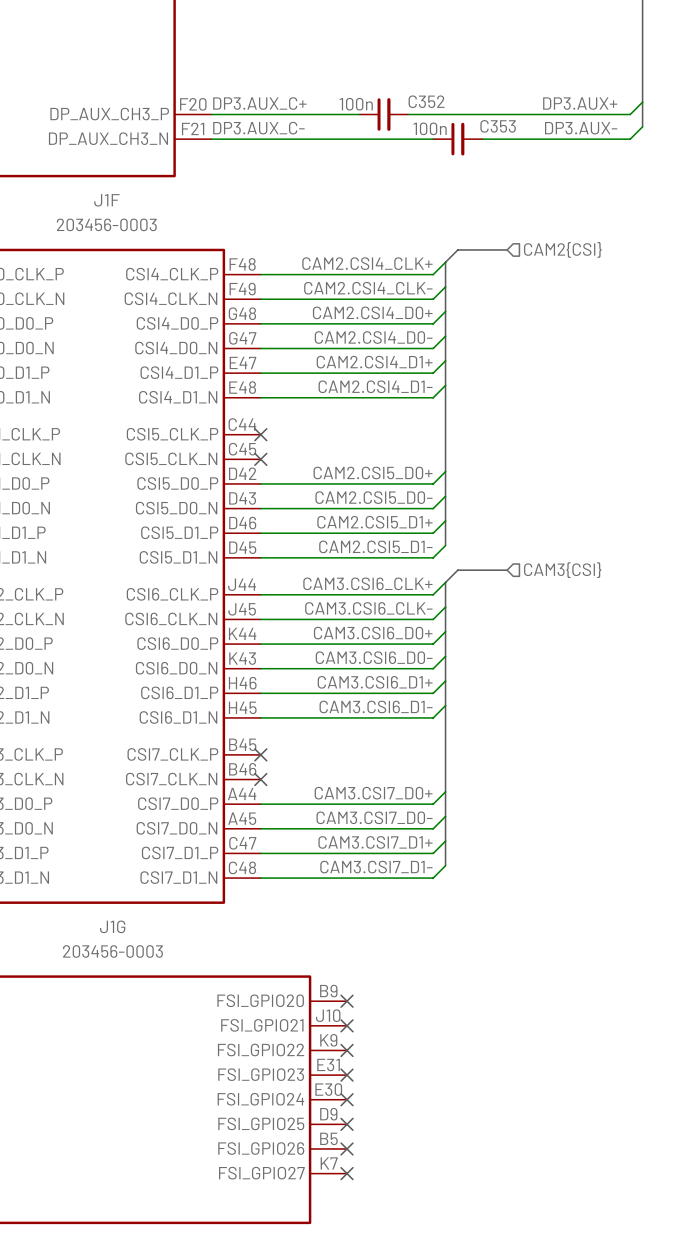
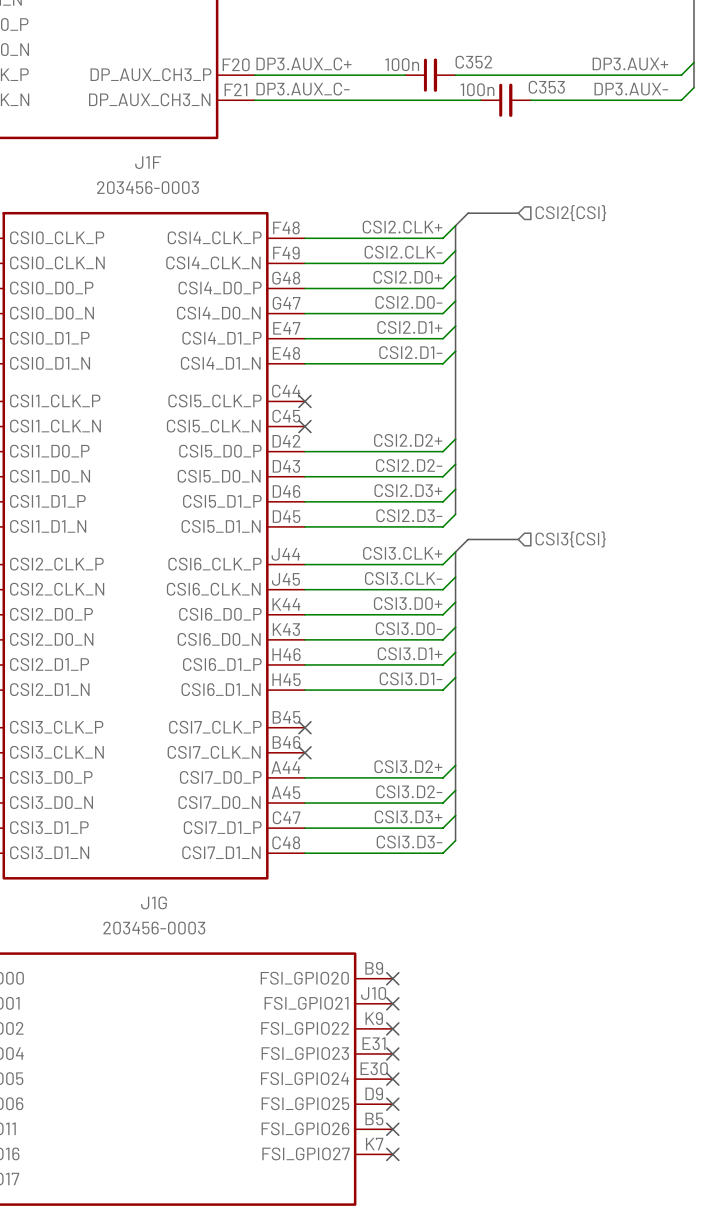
bus: (457, 249) (445, 262) (445, 545) -> (505, 213) (468, 213) (455, 225) (455, 514)
bus: (470, 249) (507, 249) -> none
hierarchical label: CAM2{CSI} (562, 249) -> CSI2{CSI} (570, 213)
wire: (445, 262) (433, 274) (396, 274) -> (455, 225) (443, 238)
label: CAM2.CSI4_CLK+ (367, 263) -> CSI2.CLK+ (402, 227)
wire: (445, 286) (433, 299) (396, 299) -> (455, 250) (443, 263)
label: CAM2.CSI4_CLK- (368, 288) -> CSI2.CLK- (403, 252)
wire: (445, 311) (433, 323) (396, 323) -> (455, 275) (443, 288)
label: none -> CSI2.D0+ (407, 277)
label: CAM2.CSI4_D0+ (372, 312) -> none
wire: (445, 336) (433, 348) (396, 348) -> (455, 301) (443, 313)
label: none -> CSI2.D0- (408, 302)
label: CAM2.CSI4_D0- (373, 337) -> none
wire: (445, 360) (433, 373) (396, 373) -> (455, 326) (443, 338)
label: none -> CSI2.D1+ (409, 327)
label: CAM2.CSI4_D1+ (374, 362) -> none
wire: (445, 385) (433, 397) (396, 397) -> (455, 351) (443, 363)
label: none -> CSI2.D1- (410, 352)
label: CAM2.CSI4_D1- (375, 386) -> none
wire: (445, 471) (433, 483) (396, 483) -> (455, 439) (443, 451)
label: none -> CSI2.D2+ (408, 440)
label: CAM2.CSI5_D0+ (373, 472) -> none
wire: (445, 496) (433, 508) (396, 508) -> (455, 464) (443, 476)
label: none -> CSI2.D2- (409, 465)
label: CAM2.CSI5_D0- (373, 497) -> none
wire: (445, 520) (433, 533) (396, 533) -> (455, 489) (443, 501)
label: none -> CSI2.D3+ (408, 490)
label: CAM2.CSI5_D1+ (374, 522) -> none
wire: (445, 545) (433, 557) (396, 557) -> (455, 514) (443, 526)
label: none -> CSI2.D3- (409, 515)
label: CAM2.CSI5_D1- (375, 546) -> none
bus: (457, 570) (445, 582) (445, 865) -> (505, 539) (468, 539) (455, 552) (455, 840)
bus: (470, 570) (507, 570) -> none
hierarchical label: CAM3{CSI} (562, 570) -> CSI3{CSI} (570, 539)
wire: (445, 582) (433, 594) (396, 594) -> (455, 552) (443, 564)
label: CAM3.CSI6_CLK+ (367, 583) -> CSI3.CLK+ (402, 553)
wire: (445, 607) (433, 619) (396, 619) -> (455, 577) (443, 589)
label: CAM3.CSI6_CLK- (368, 608) -> CSI3.CLK- (403, 578)
wire: (445, 631) (433, 644) (396, 644) -> (455, 602) (443, 614)
label: none -> CSI3.D0+ (408, 603)
label: CAM3.CSI6_D0+ (373, 633) -> none
wire: (445, 656) (433, 668) (396, 668) -> (455, 627) (443, 639)
label: none -> CSI3.D0- (409, 628)
label: CAM3.CSI6_D0- (374, 657) -> none
wire: (445, 681) (433, 693) (396, 693) -> (455, 652) (443, 664)
label: none -> CSI3.D1+ (410, 653)
label: CAM3.CSI6_D1+ (375, 682) -> none
wire: (445, 705) (433, 717) (396, 717) -> (455, 677) (443, 690)
label: none -> CSI3.D1- (410, 678)
label: CAM3.CSI6_D1- (376, 706) -> none
wire: (445, 791) (433, 804) (396, 804) -> (455, 765) (443, 777)
label: none -> CSI3.D2+ (408, 766)
label: CAM3.CSI7_D0+ (373, 793) -> none
wire: (445, 816) (433, 828) (396, 828) -> (455, 790) (443, 803)
label: none -> CSI3.D2- (409, 791)
label: CAM3.CSI7_D0- (374, 817) -> none
wire: (445, 841) (433, 853) (396, 853) -> (455, 815) (443, 828)
label: none -> CSI3.D3+ (408, 816)
label: CAM3.CSI7_D1+ (375, 842) -> none
wire: (445, 865) (433, 878) (396, 878) -> (455, 840) (443, 853)
label: none -> CSI3.D3- (409, 842)
label: CAM3.CSI7_D1- (376, 867) -> none

